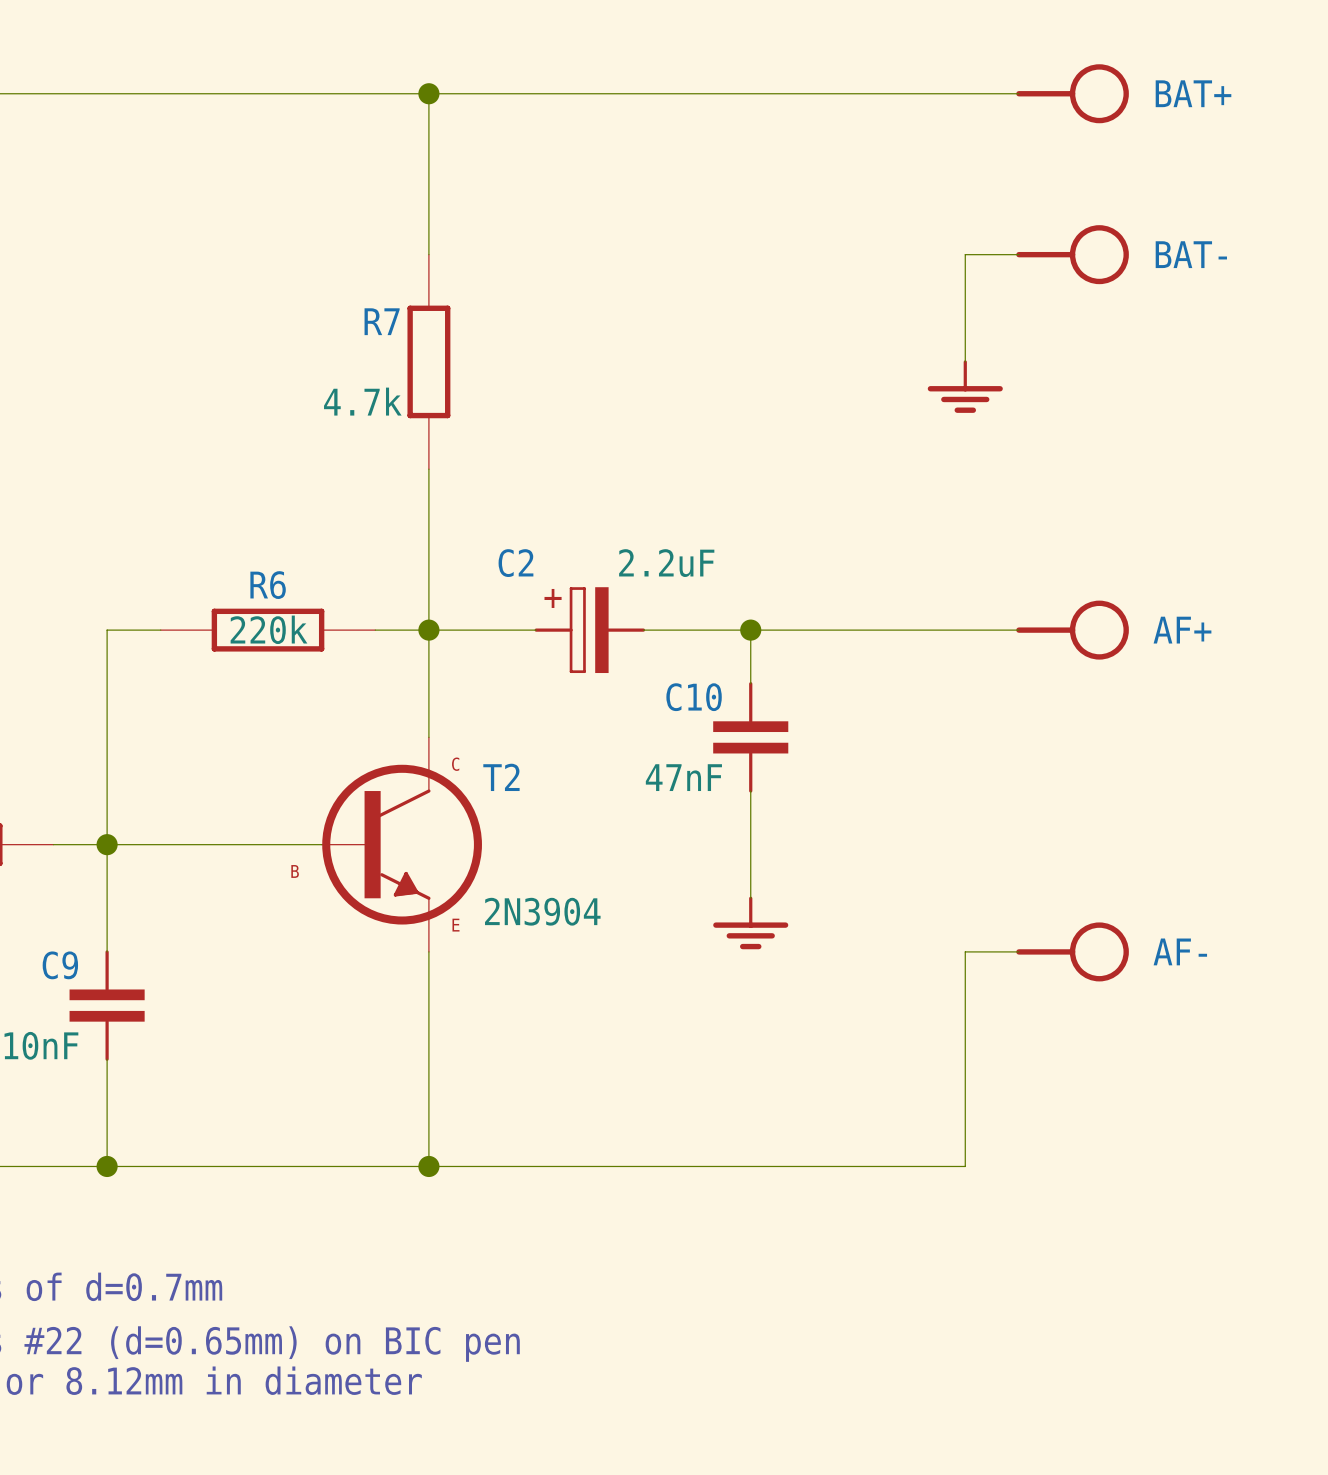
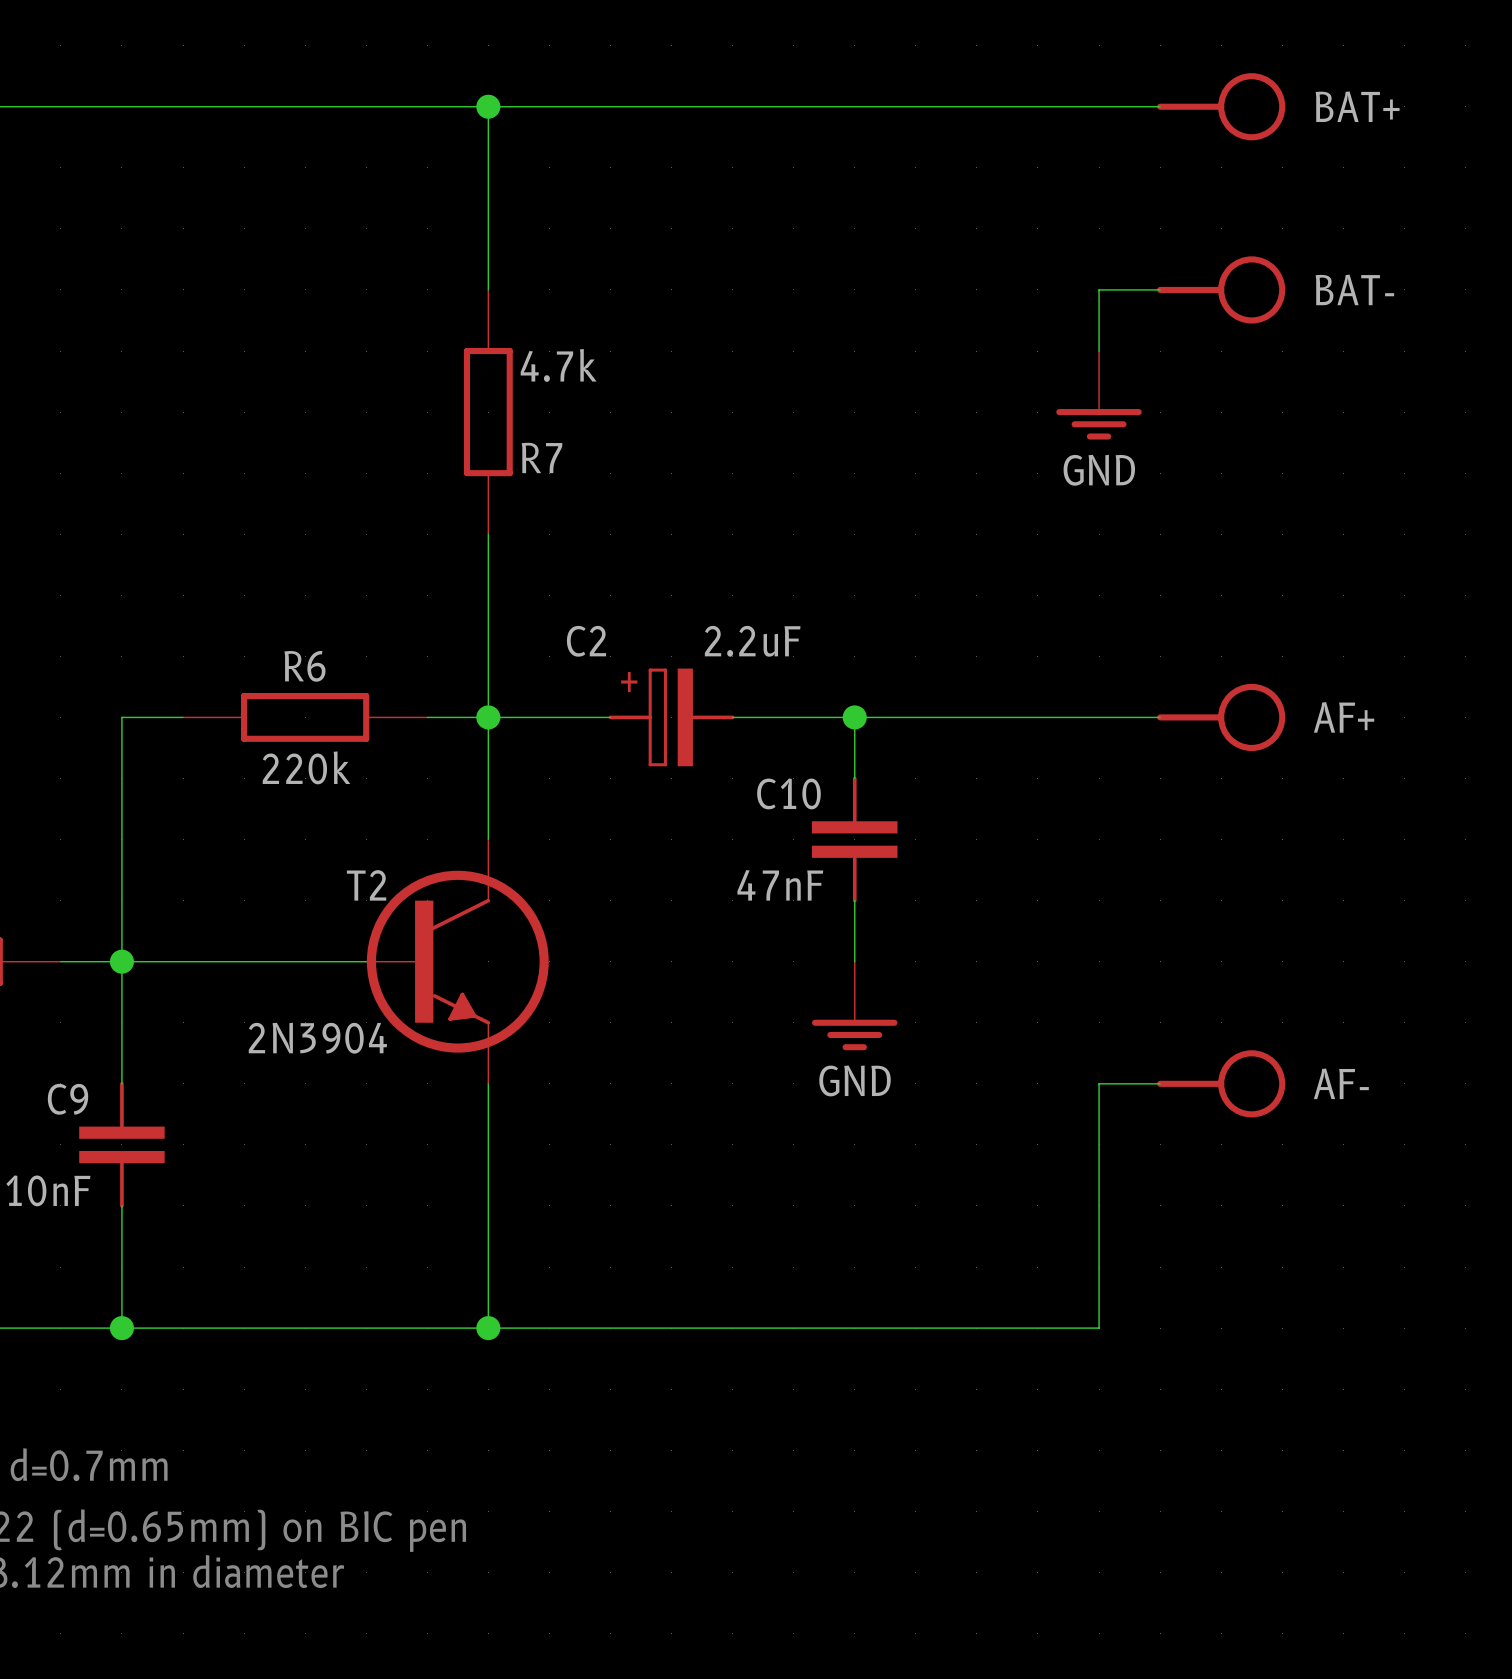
R7 name position: R7 (382, 321) -> R7 (541, 457)
power symbol: none -> GND (1099, 395)
power symbol: (965, 386) -> none
R7 value position: 4.7k (362, 401) -> 4.7k (558, 365)
R6 value position: 220k (268, 629) -> 220k (306, 767)
T2 text: C (455, 764) -> none
T2 name position: T2 (501, 777) -> T2 (366, 885)
T2 text: B (295, 871) -> none
power symbol: none -> GND (854, 1005)
T2 value position: 2N3904 (542, 911) -> 2N3904 (317, 1038)
power symbol: (750, 922) -> none
T2 text: E (455, 925) -> none

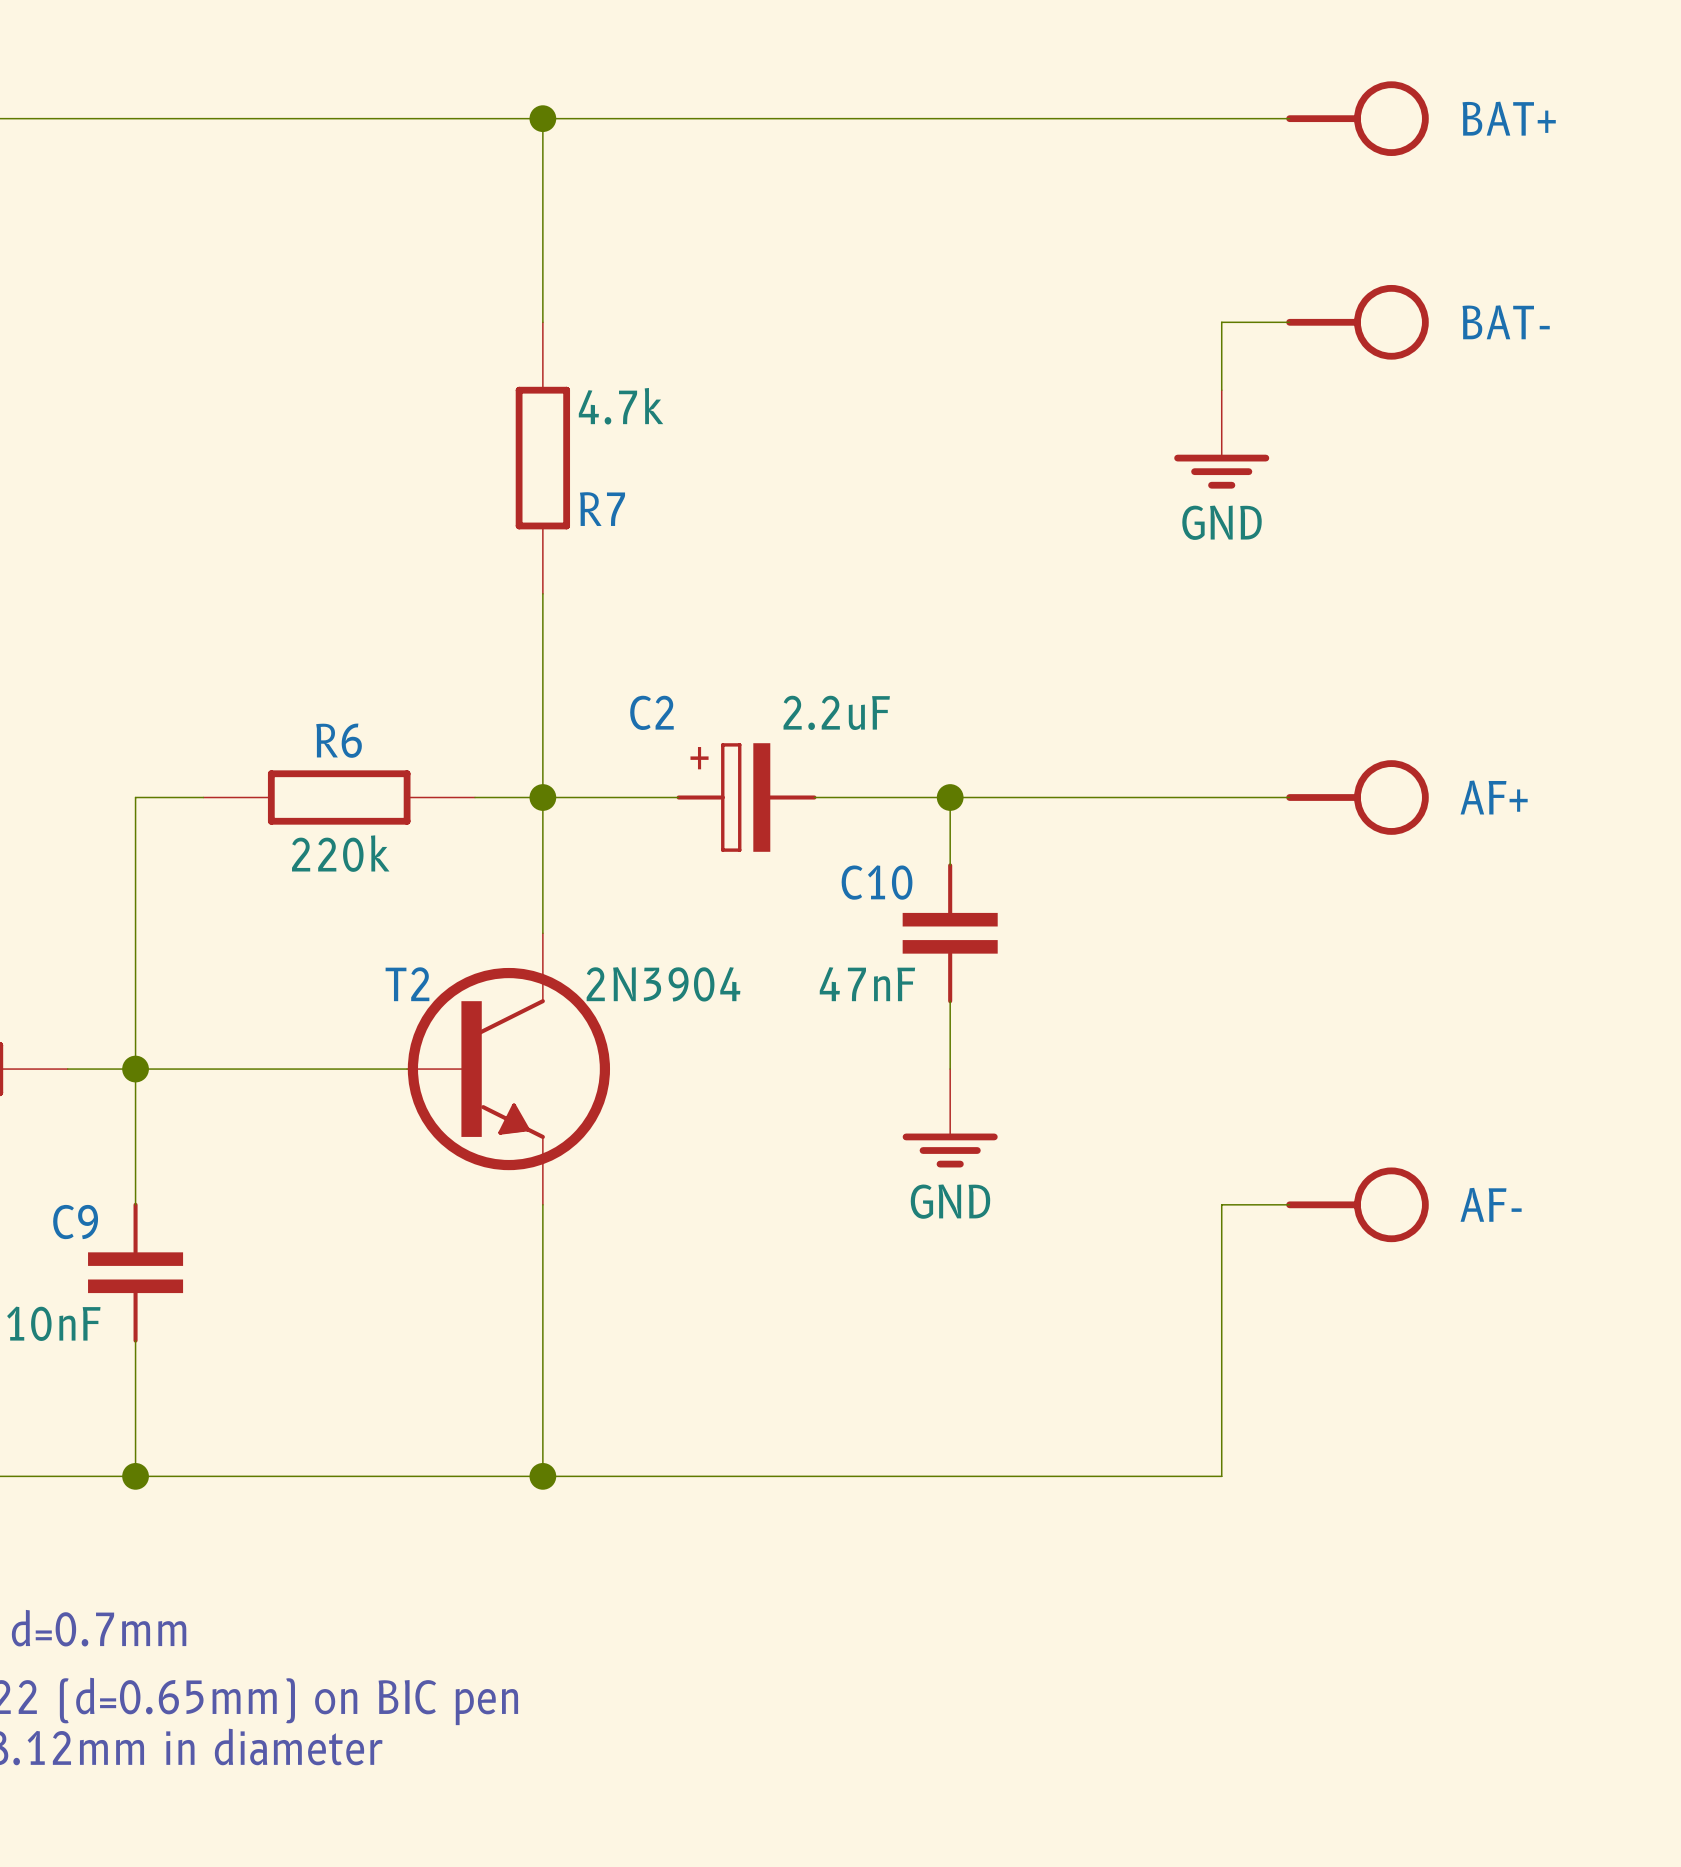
T2 value position: 2N3904 (317, 1038) -> 2N3904 (663, 984)

